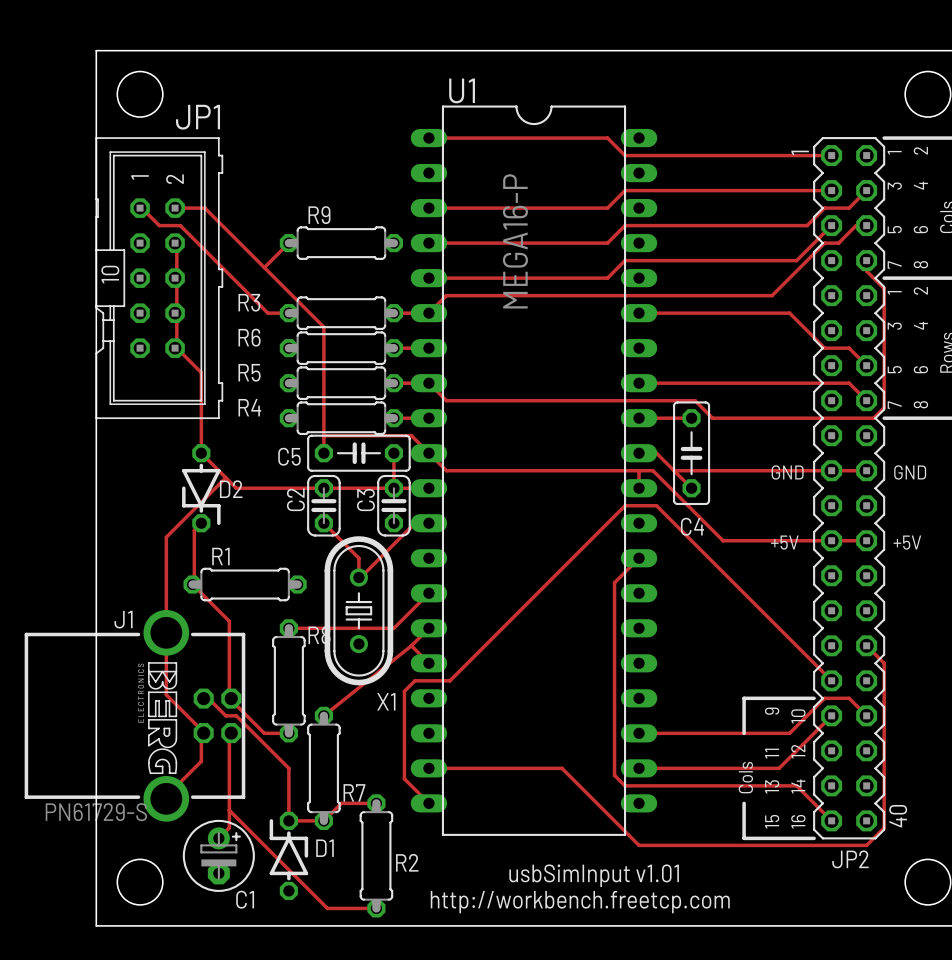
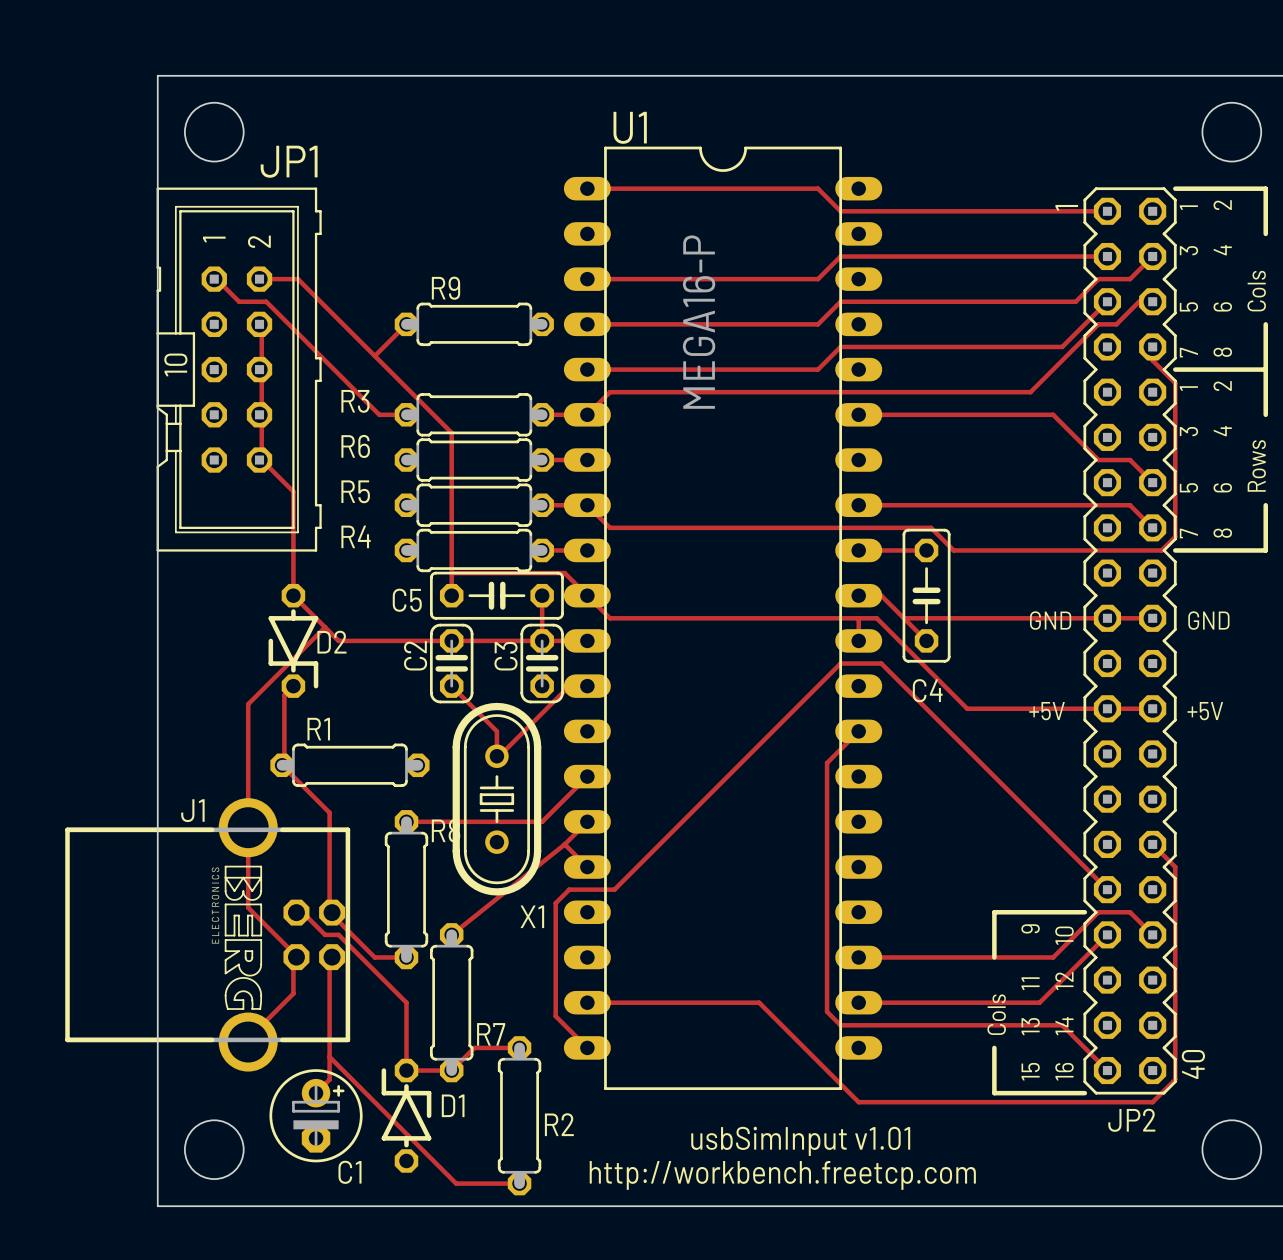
J1 footprint: [24, 609, 246, 822] -> [65, 798, 351, 1072]
J1 value: PN61729-S (96, 812) -> none

